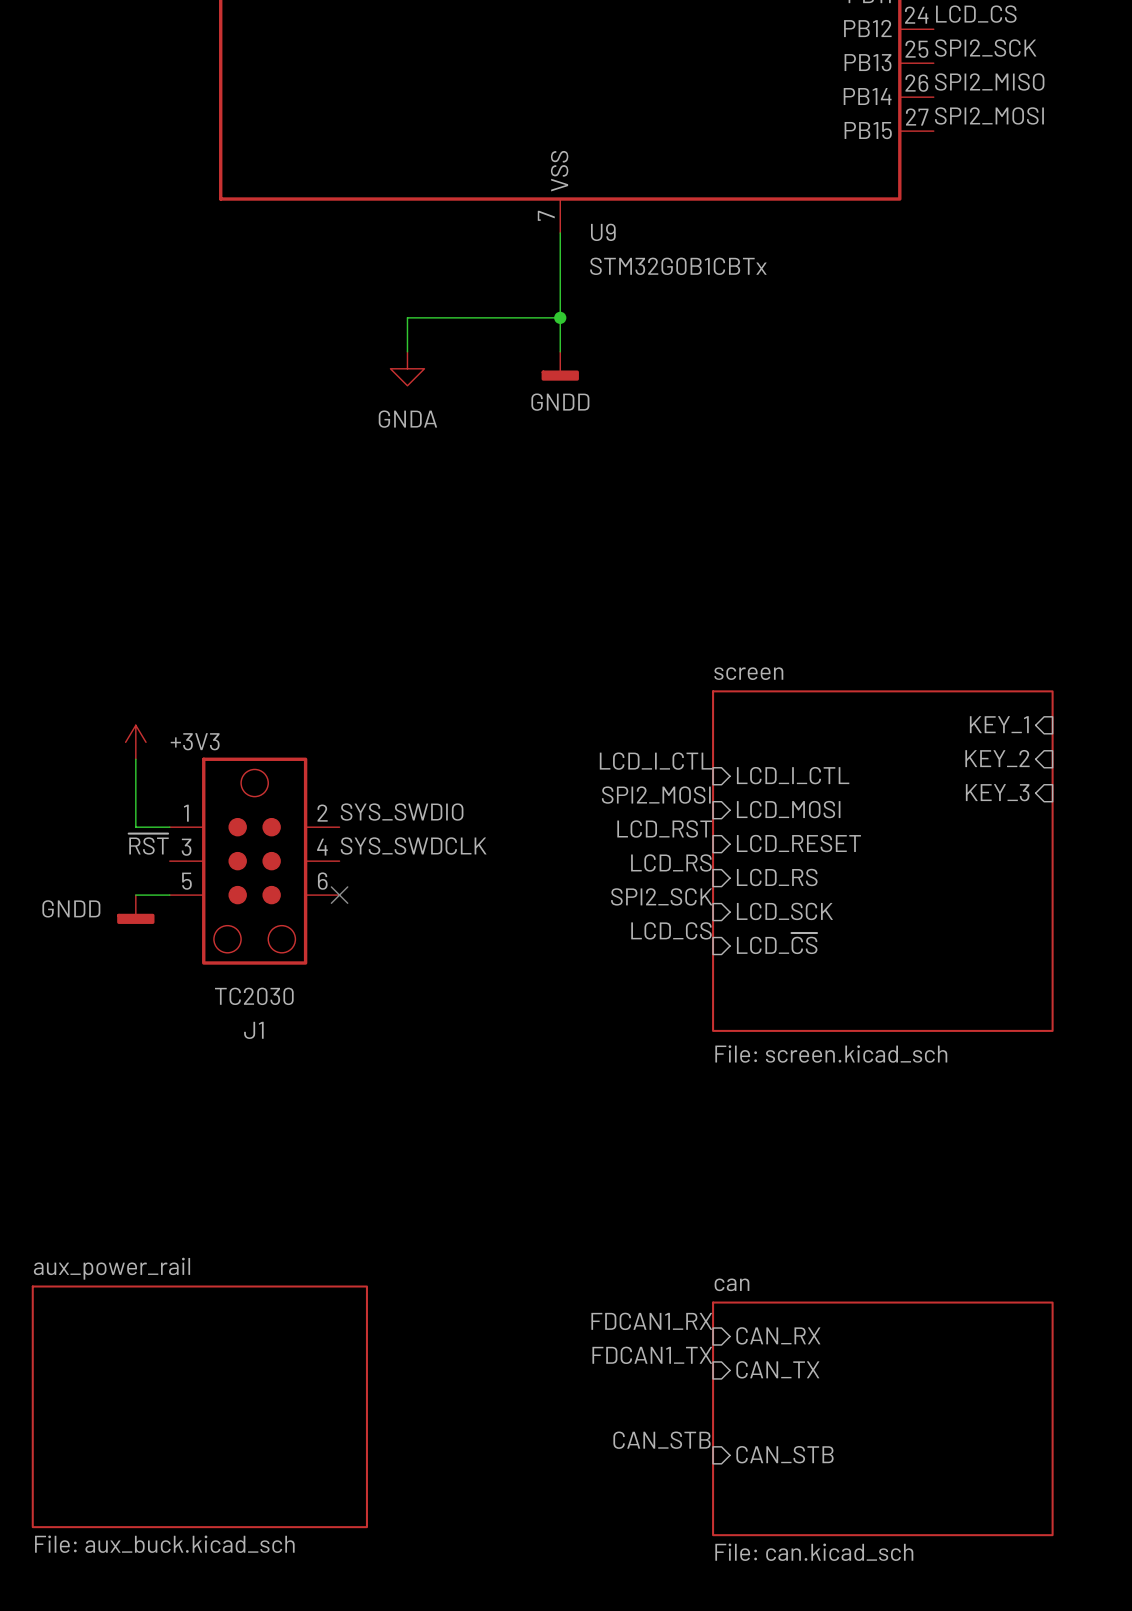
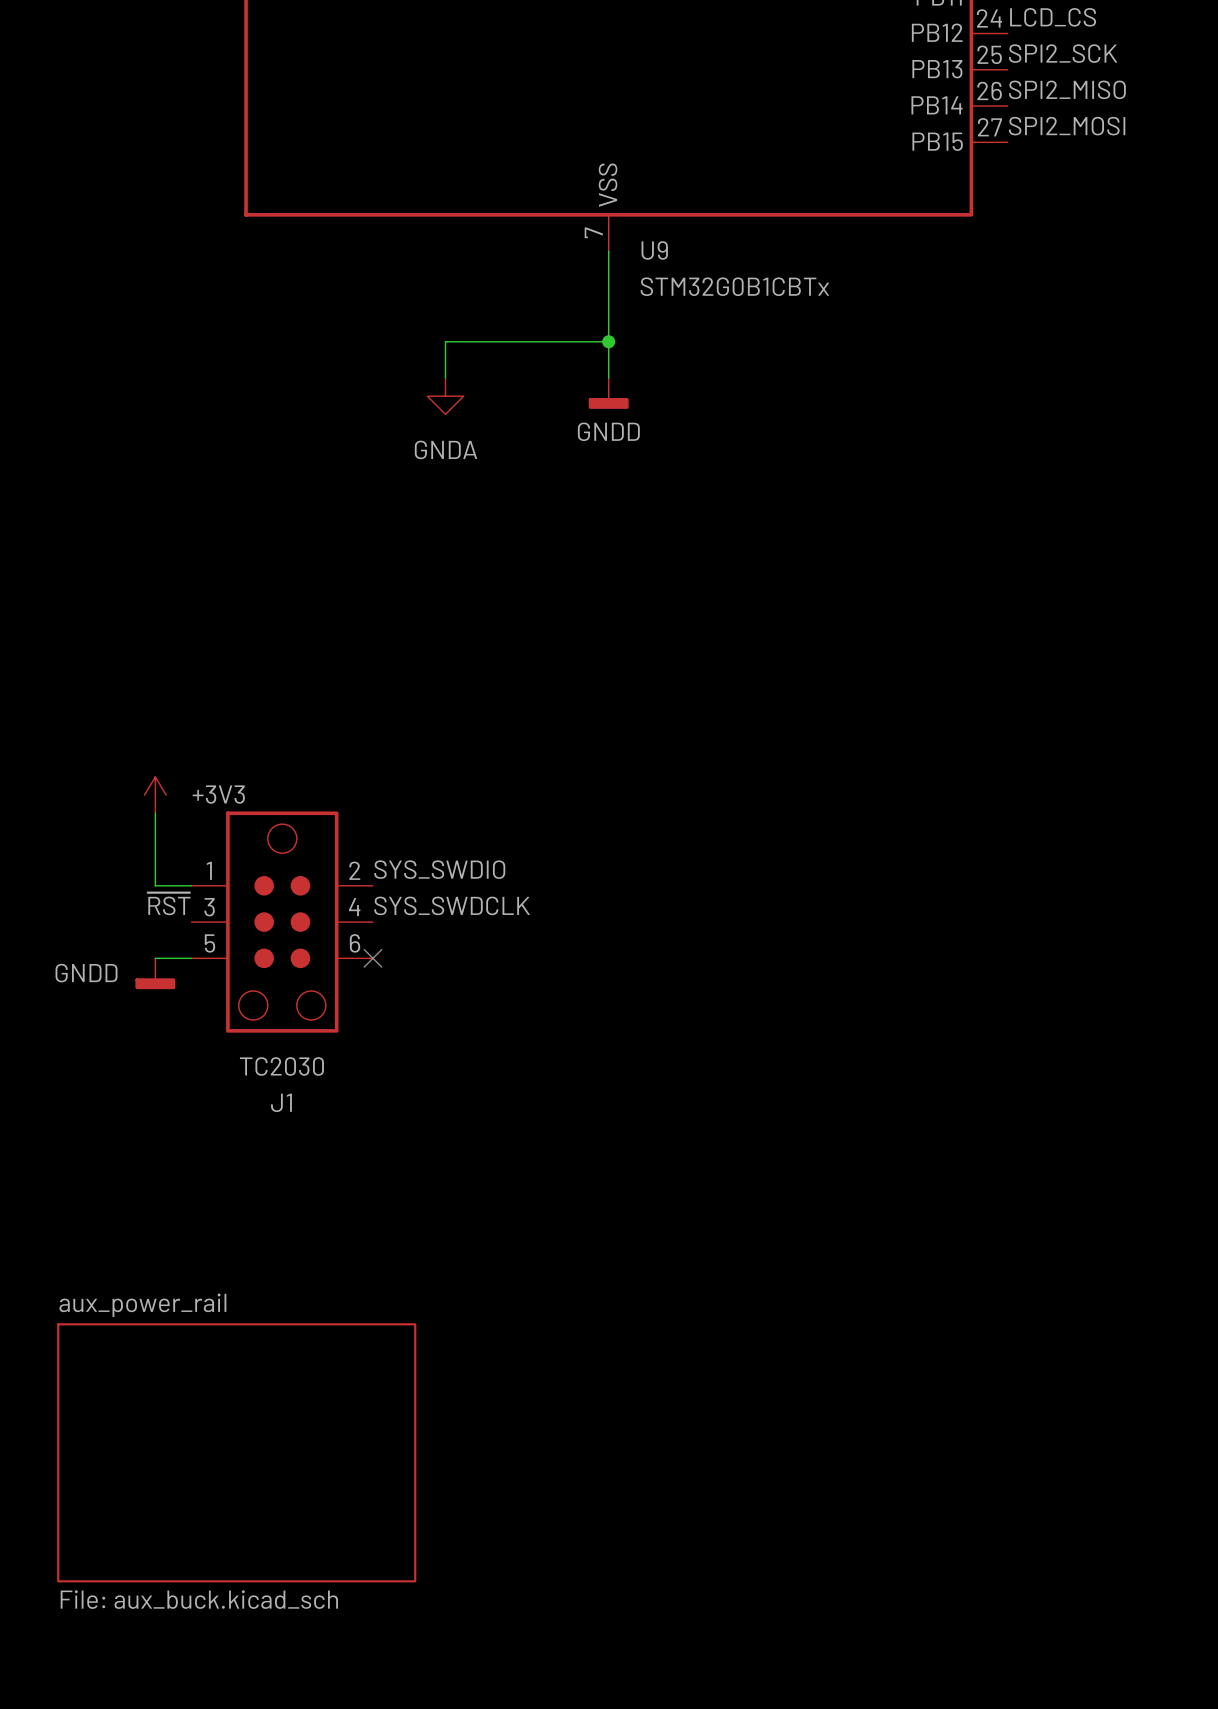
sheet pin: KEY_1 (999, 724) -> none
sheet pin: KEY_2 (997, 758) -> none
label: LCD_I_CTL (655, 761) -> none
sheet pin: LCD_I_CTL (793, 775) -> none
sheet pin: KEY_3 (997, 792) -> none
label: SPI2_MOSI (656, 795) -> none
sheet pin: LCD_MOSI (788, 809) -> none
label: LCD_RST (664, 829) -> none
sheet pin: LCD_RESET (798, 843) -> none
sheet screen: File: screen.kicad_sch (882, 861) -> none
label: LCD_RS (671, 862) -> none
sheet pin: LCD_RS (777, 877) -> none
label: SPI2_SCK (661, 896) -> none
sheet pin: LCD_SCK (784, 911) -> none
label: LCD_CS (671, 930) -> none
sheet pin: LCD_~{CS} (777, 943) -> none
label: FDCAN1_RX (651, 1321) -> none
sheet pin: CAN_RX (778, 1335) -> none
label: FDCAN1_TX (652, 1355) -> none
sheet pin: CAN_TX (777, 1369) -> none
sheet aux_power_rail position: (199, 1406) -> (236, 1452)
sheet can: File: can.kicad_sch (882, 1418) -> none
label: CAN_STB (662, 1440) -> none
sheet pin: CAN_STB (785, 1454) -> none

